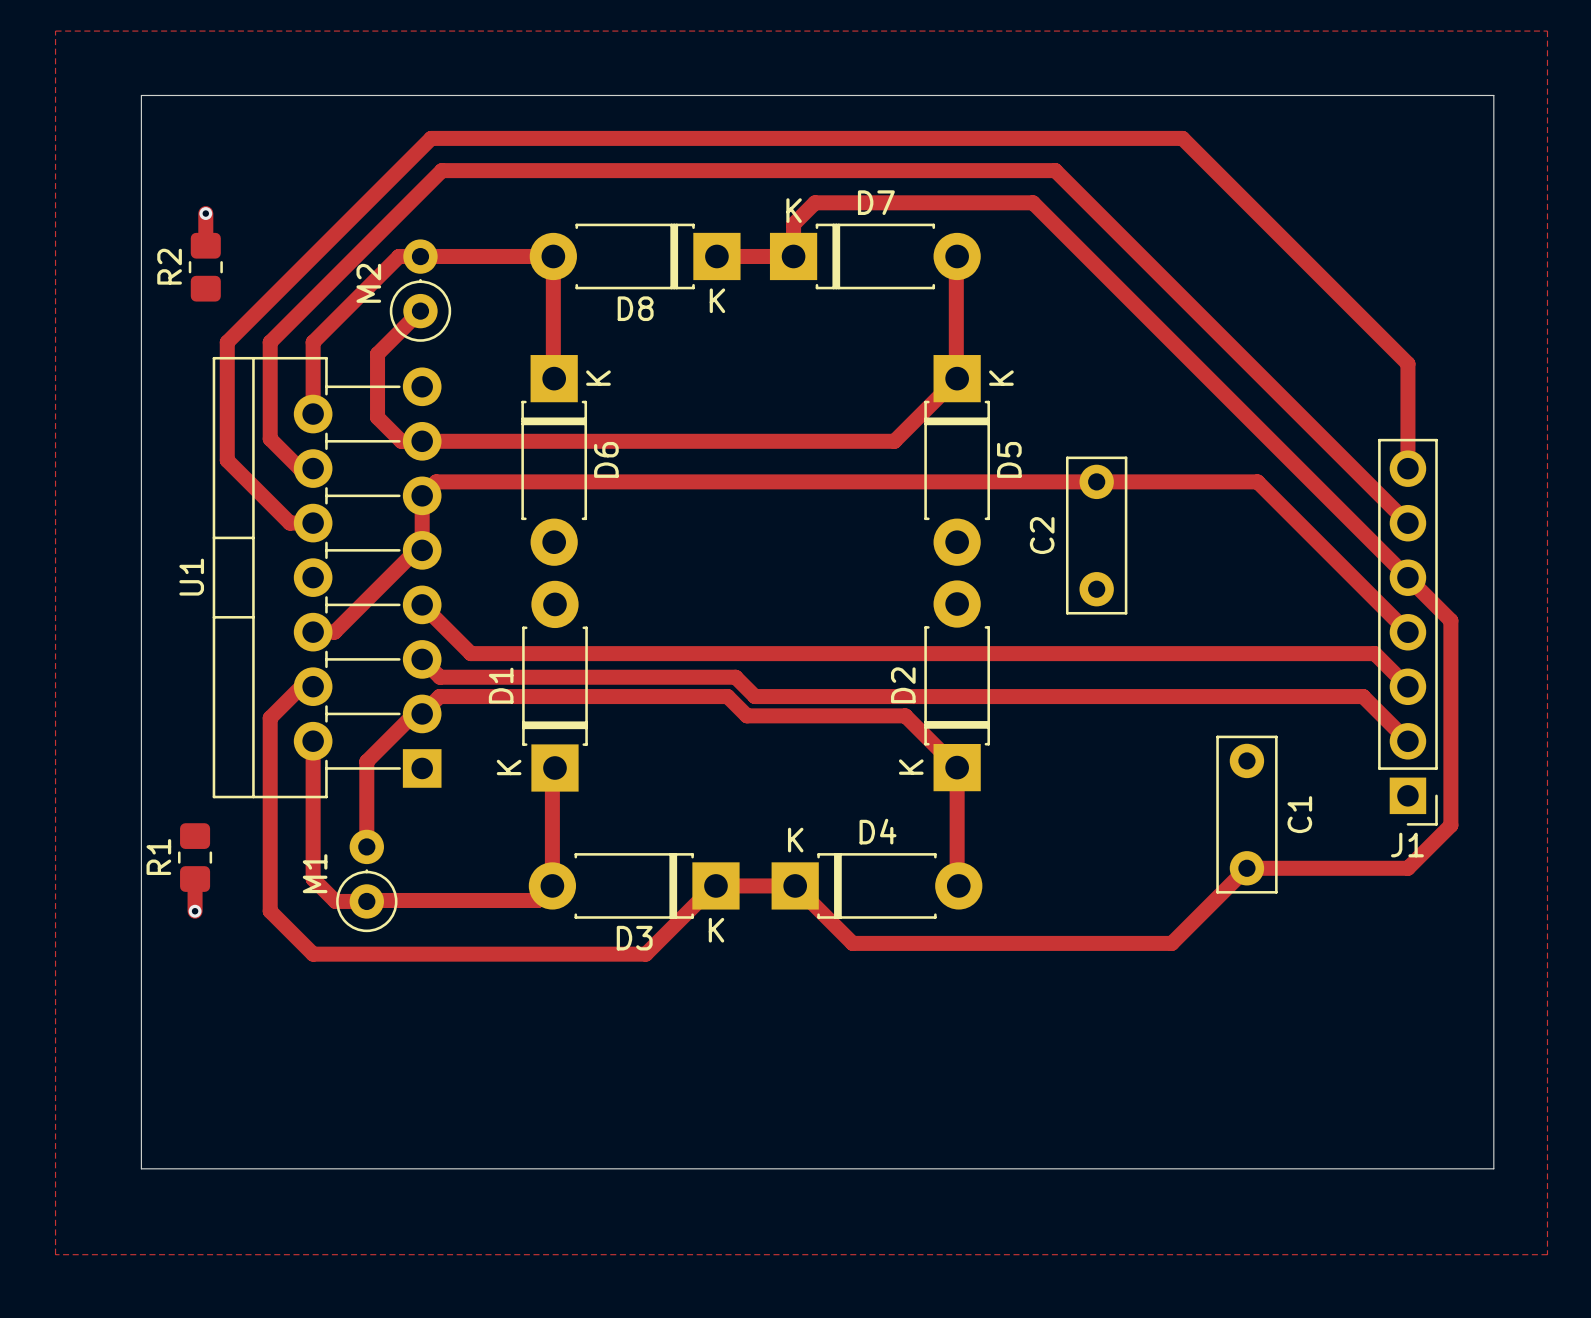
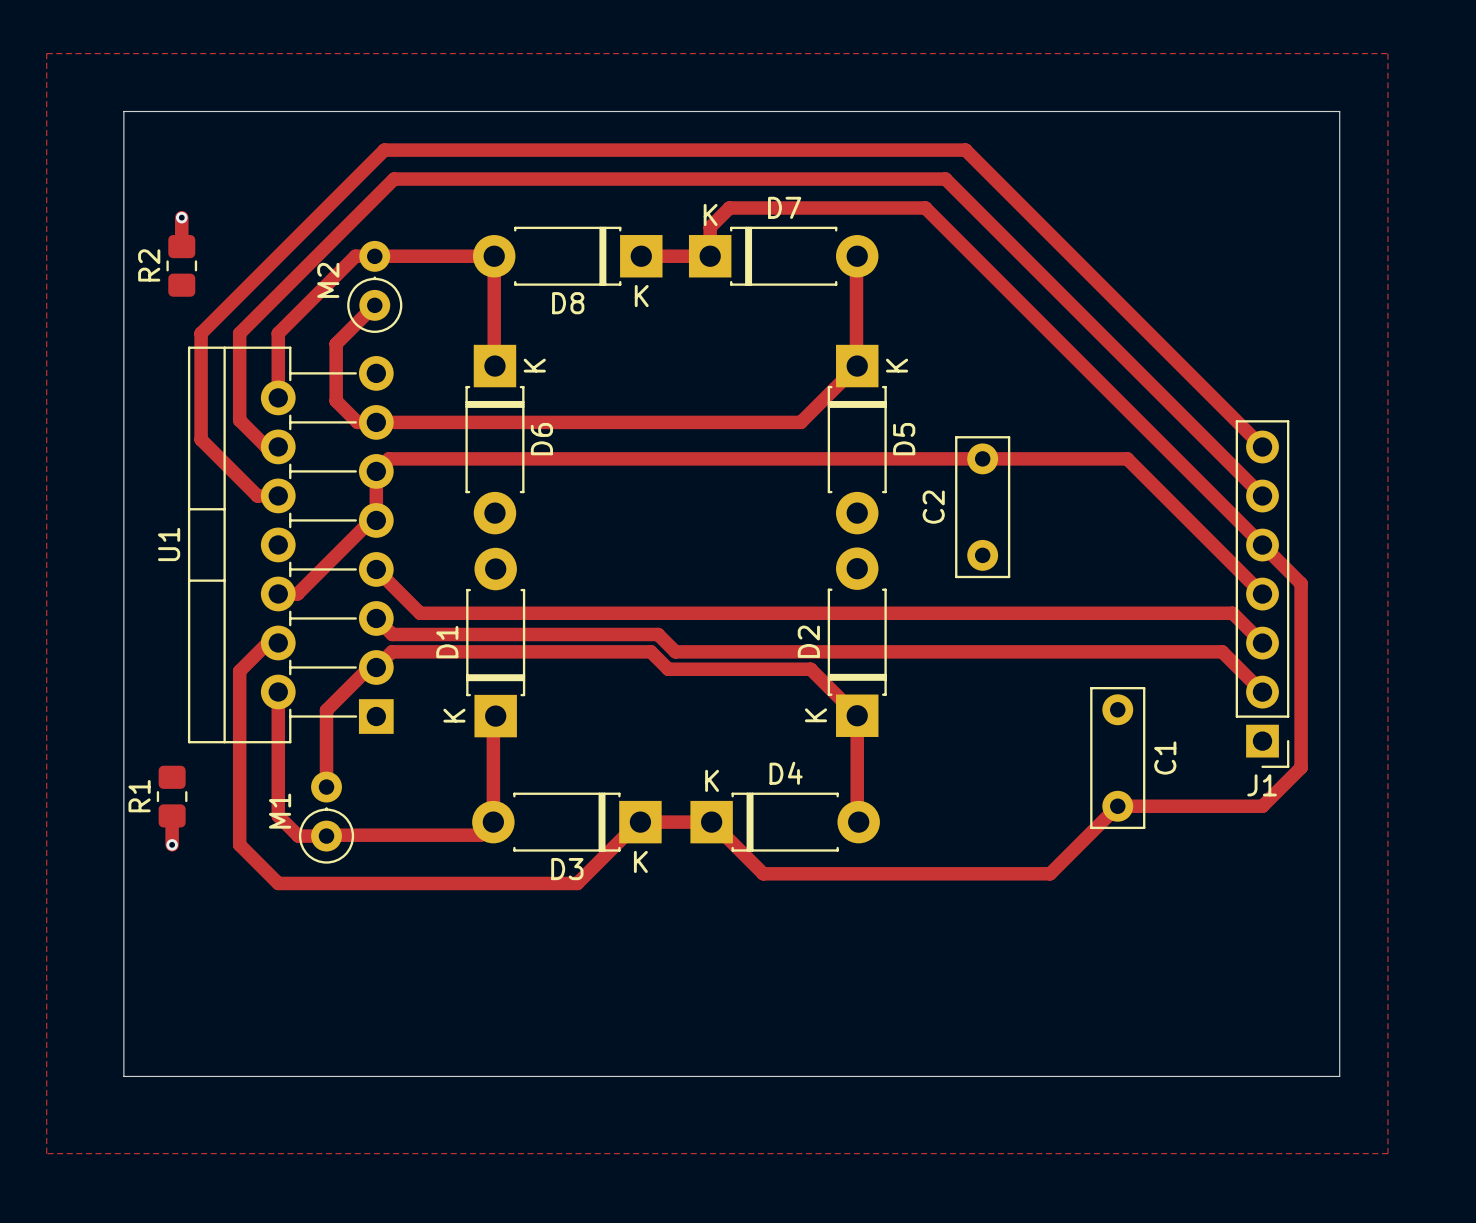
track: (1077, 138) (1182, 138) (1407, 363) (1407, 468) -> (965, 150) (1262, 447)

